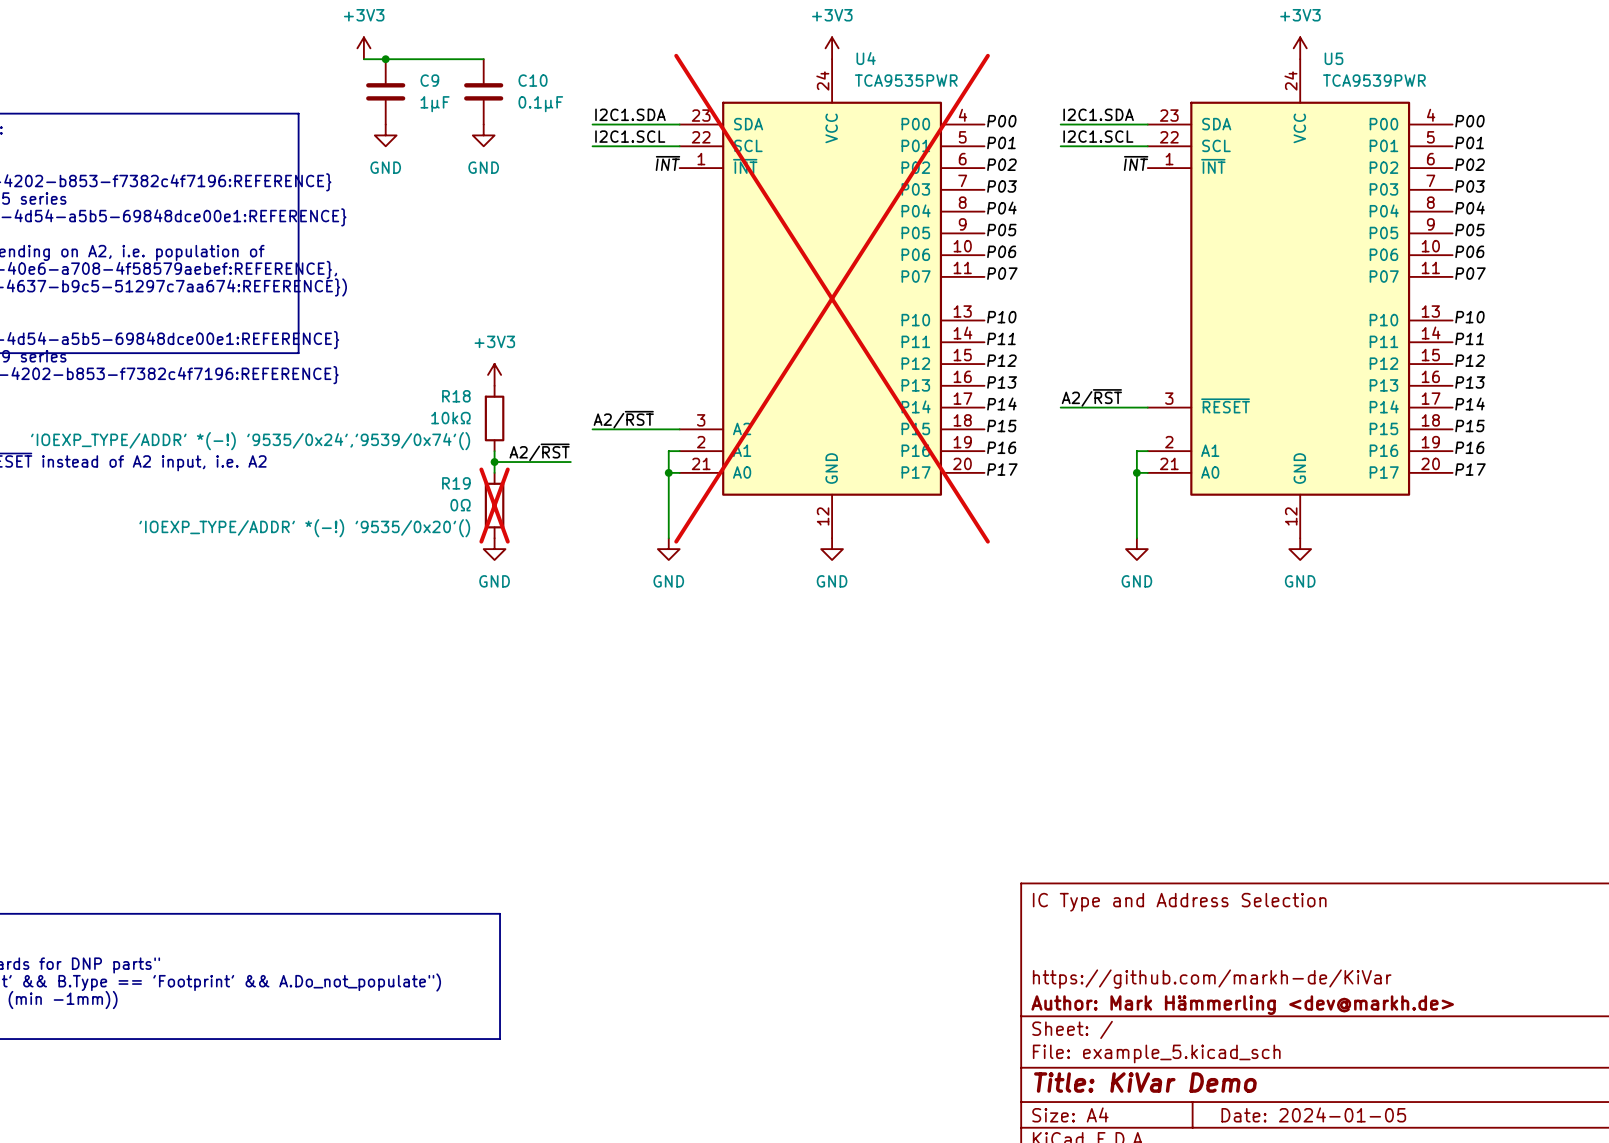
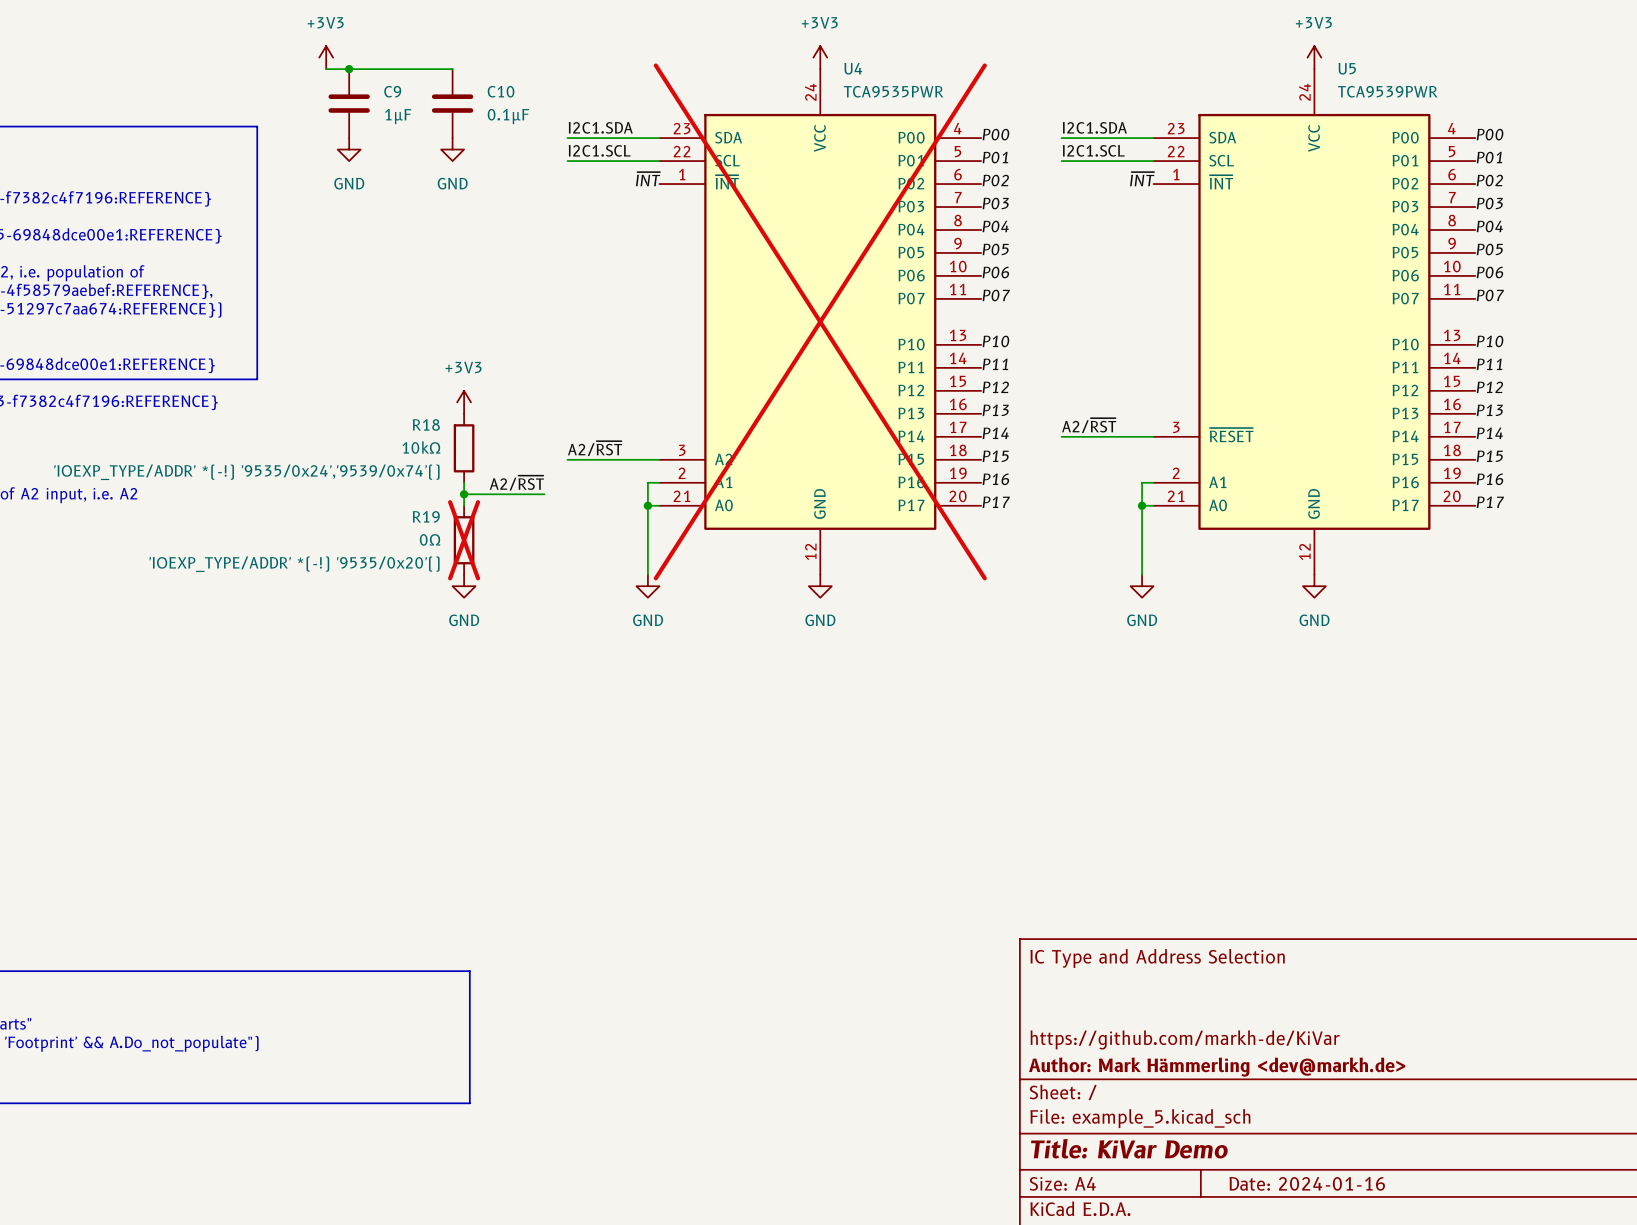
title block: Date: 2024-01-05 (1313, 1114) -> Date: 2024-01-16 (1307, 1183)

